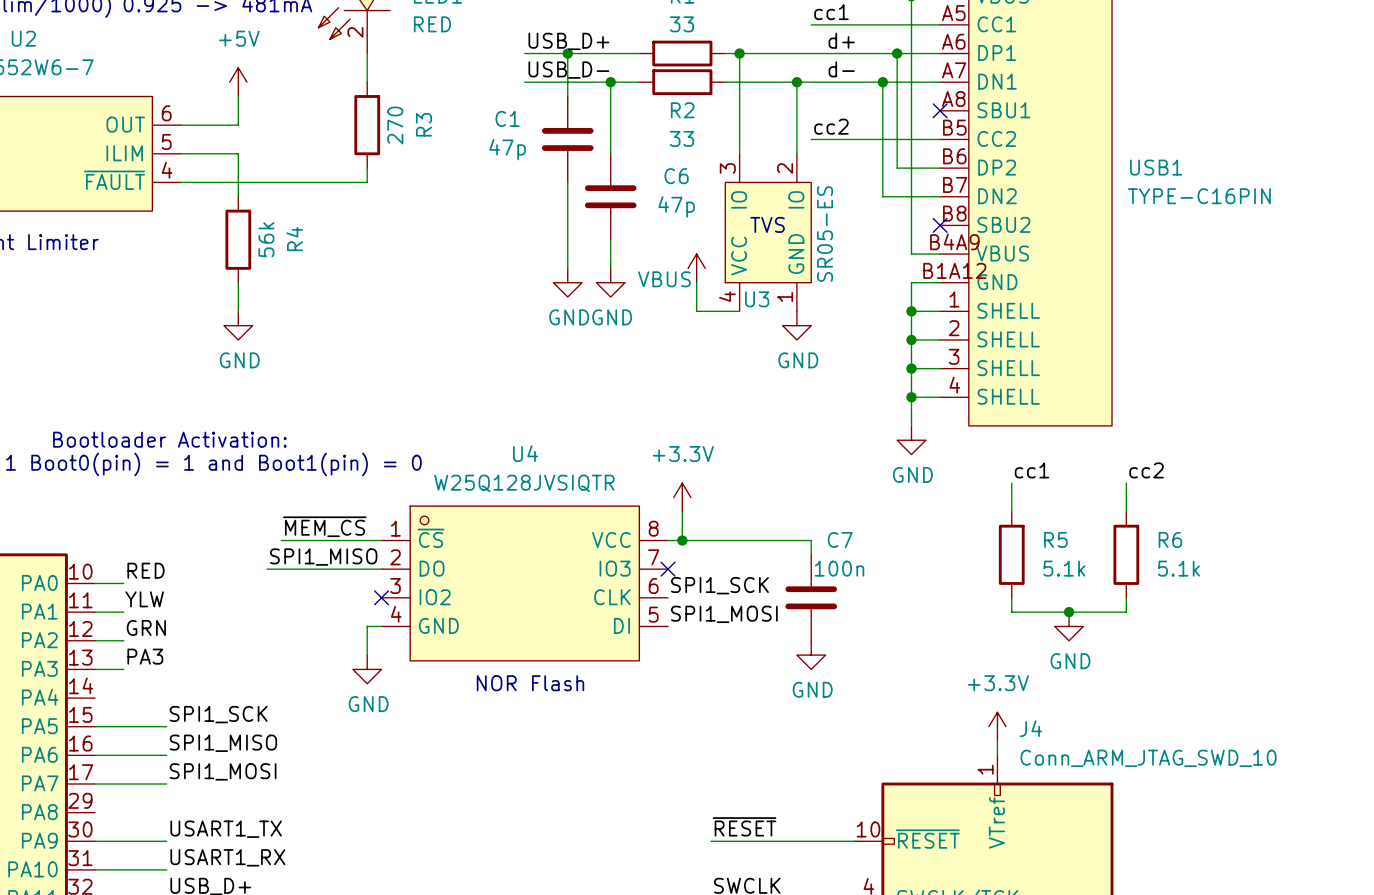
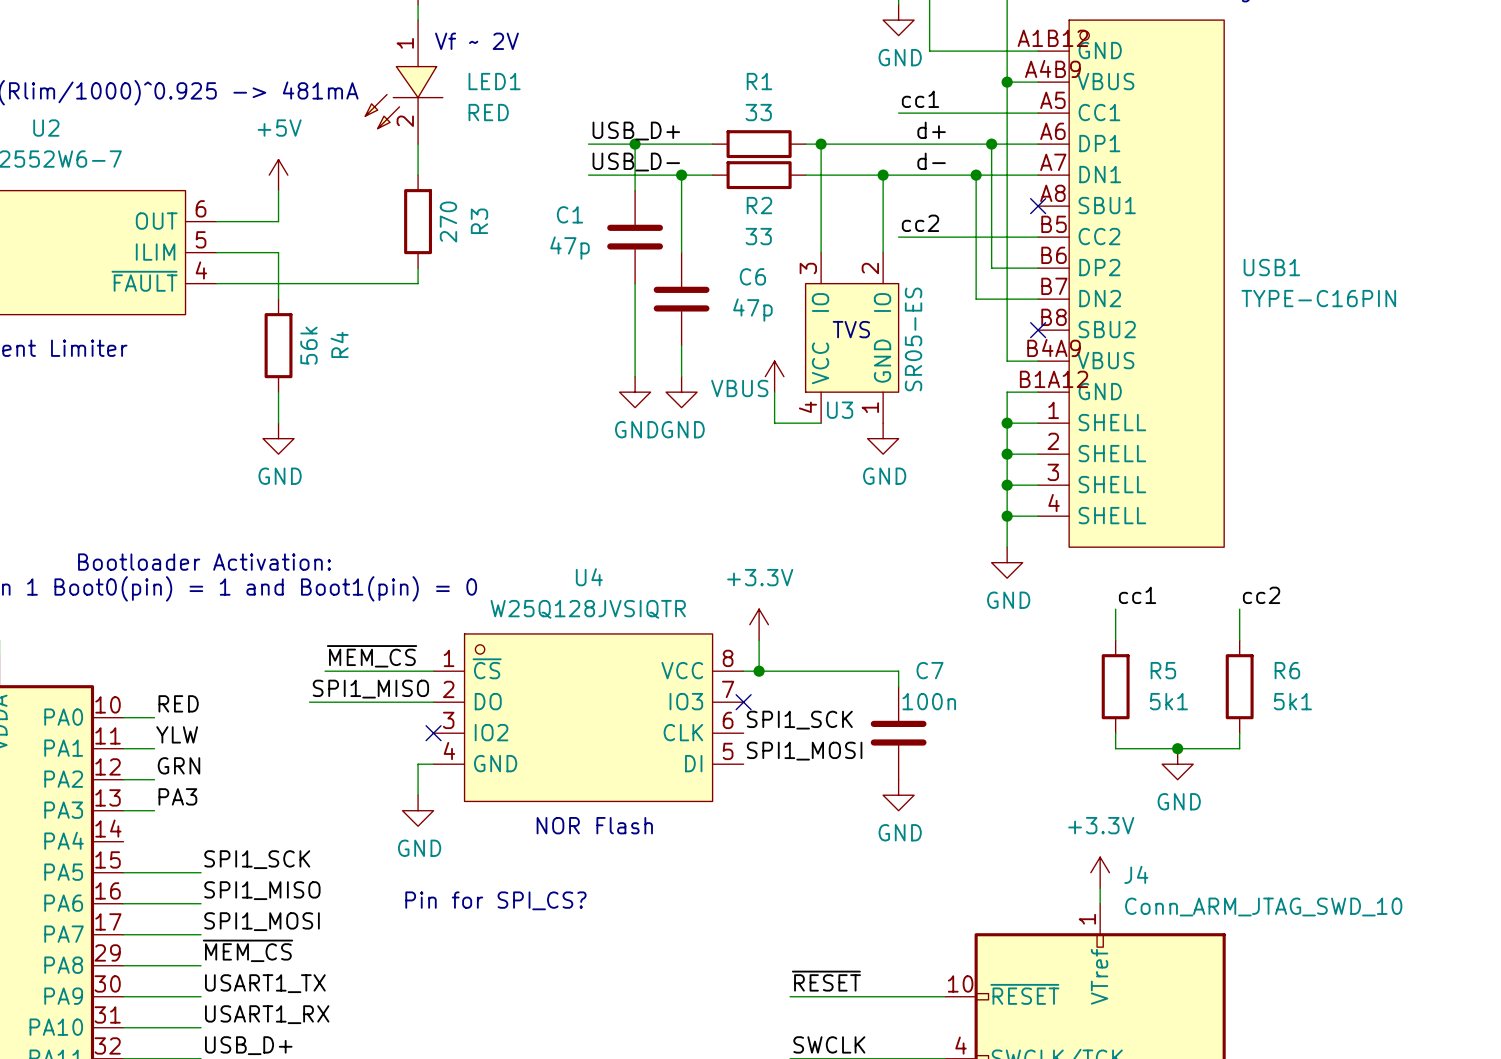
R5 value: 5.1k (1064, 568) -> 5k1 (1168, 701)
R6 value: 5.1k (1178, 568) -> 5k1 (1292, 701)
text: none -> Pin for SPI_CS? (495, 900)
label: none -> ~{MEM_CS} (248, 950)
wire: none -> (123, 965) (201, 965)

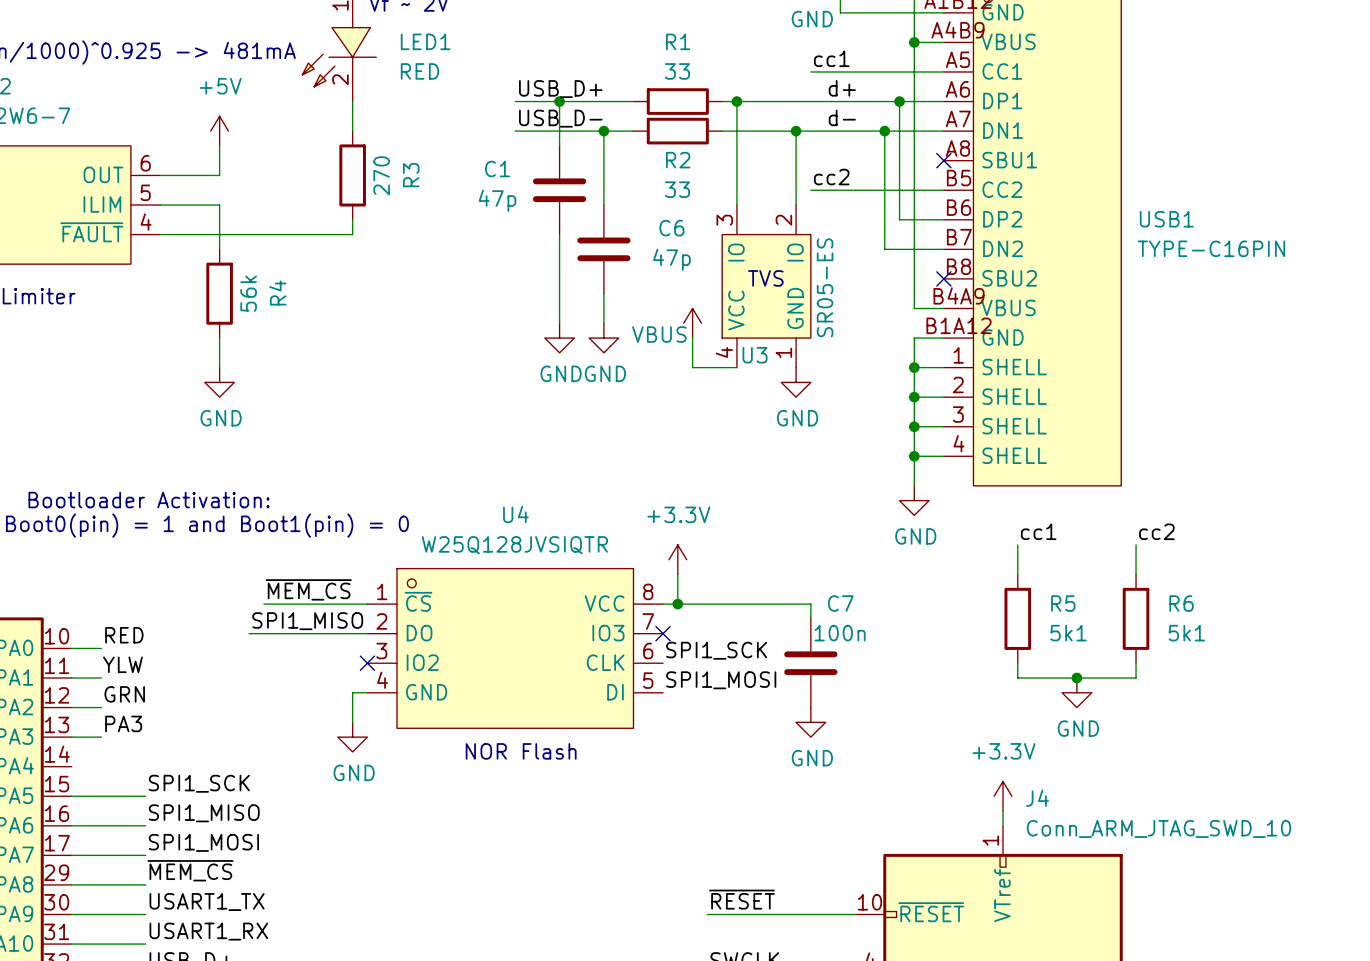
text: Pin for SPI_CS? (495, 900) -> none

